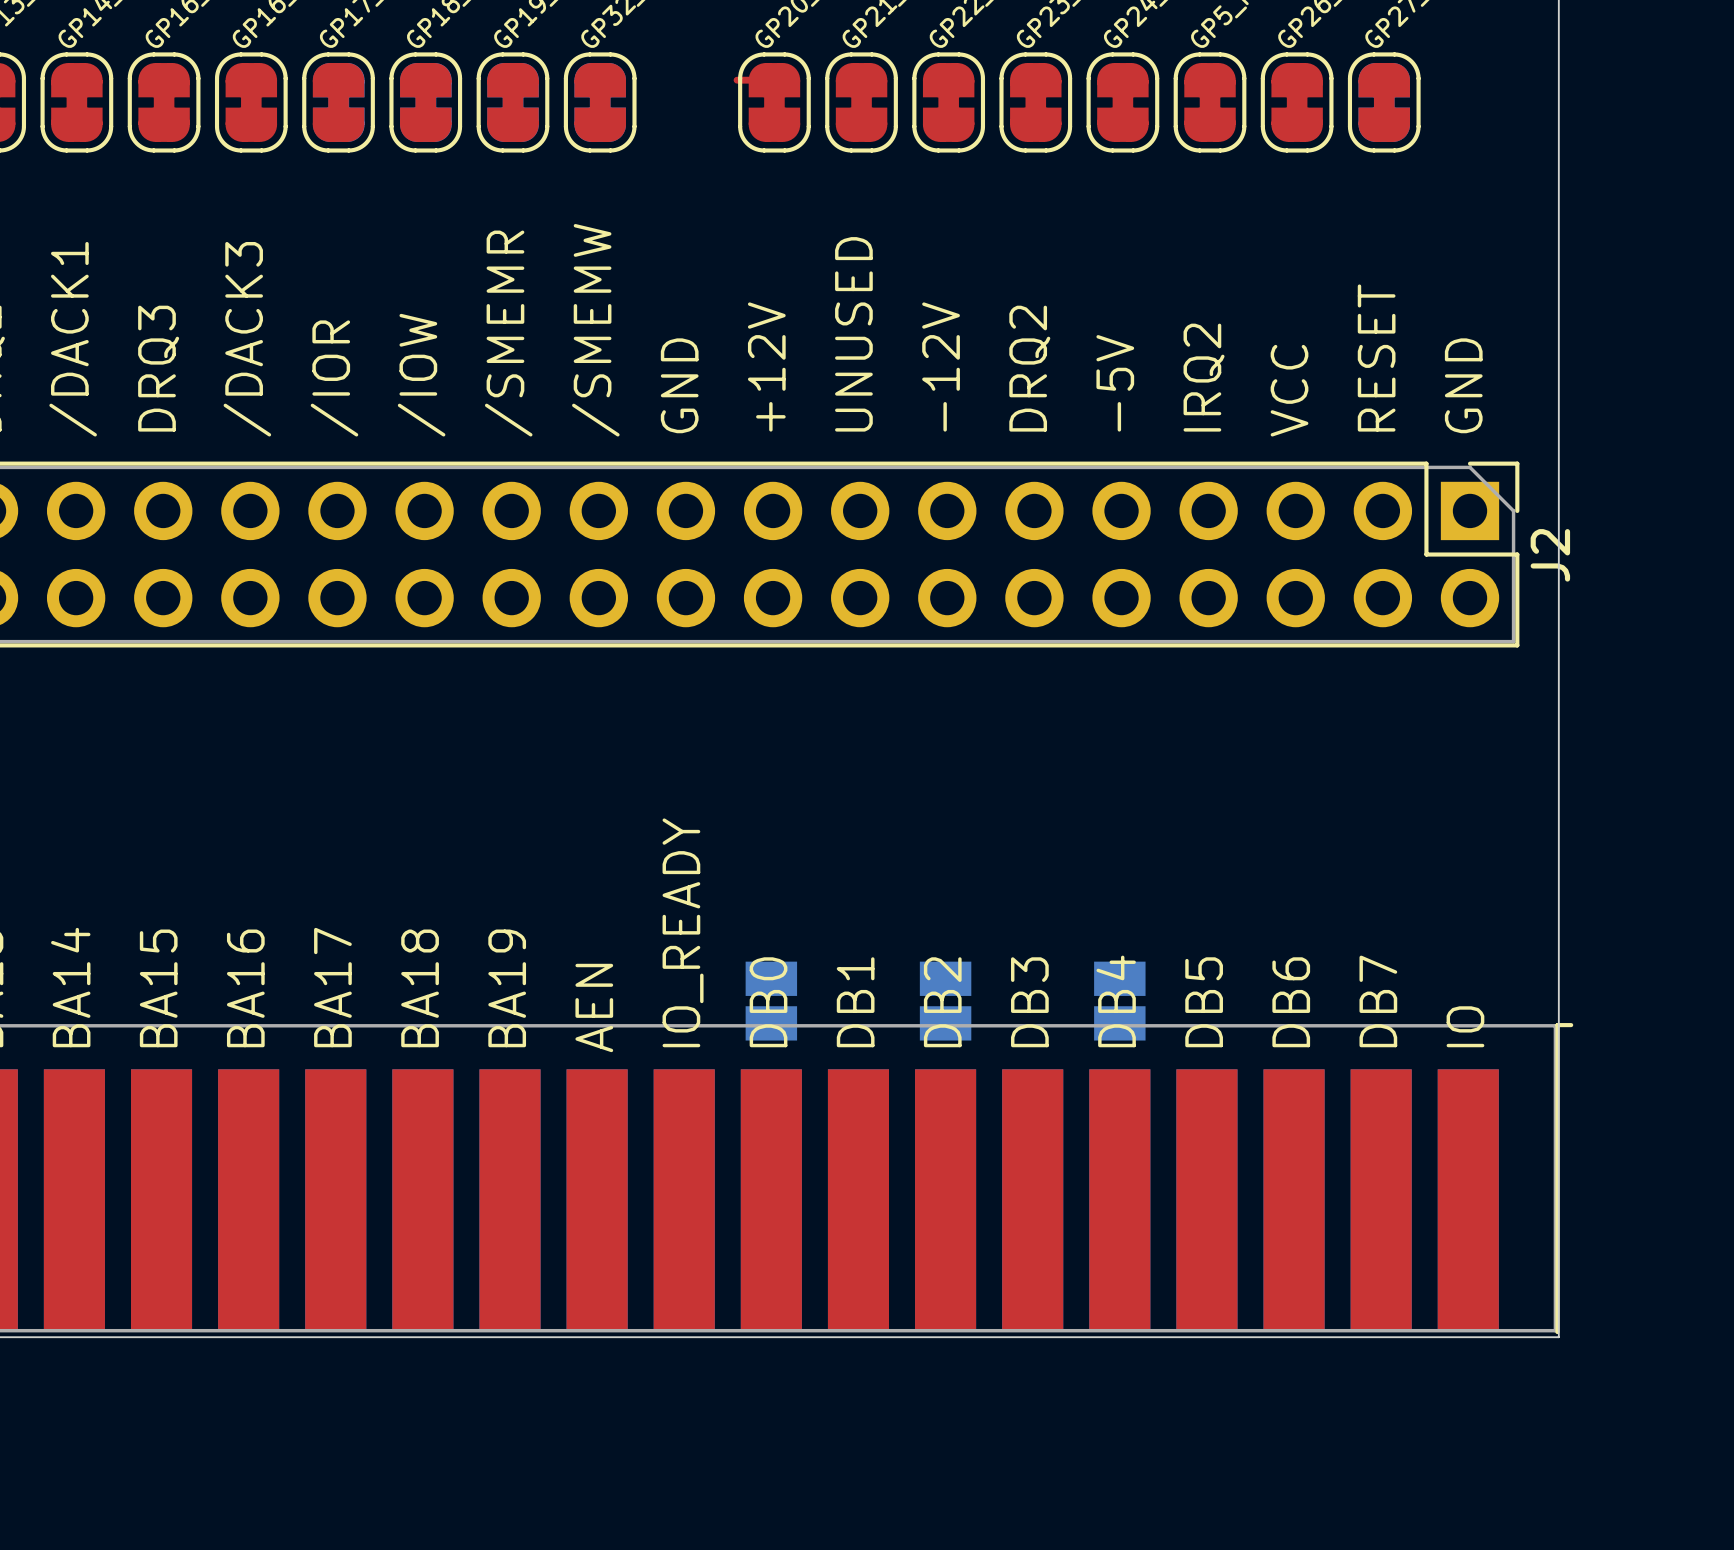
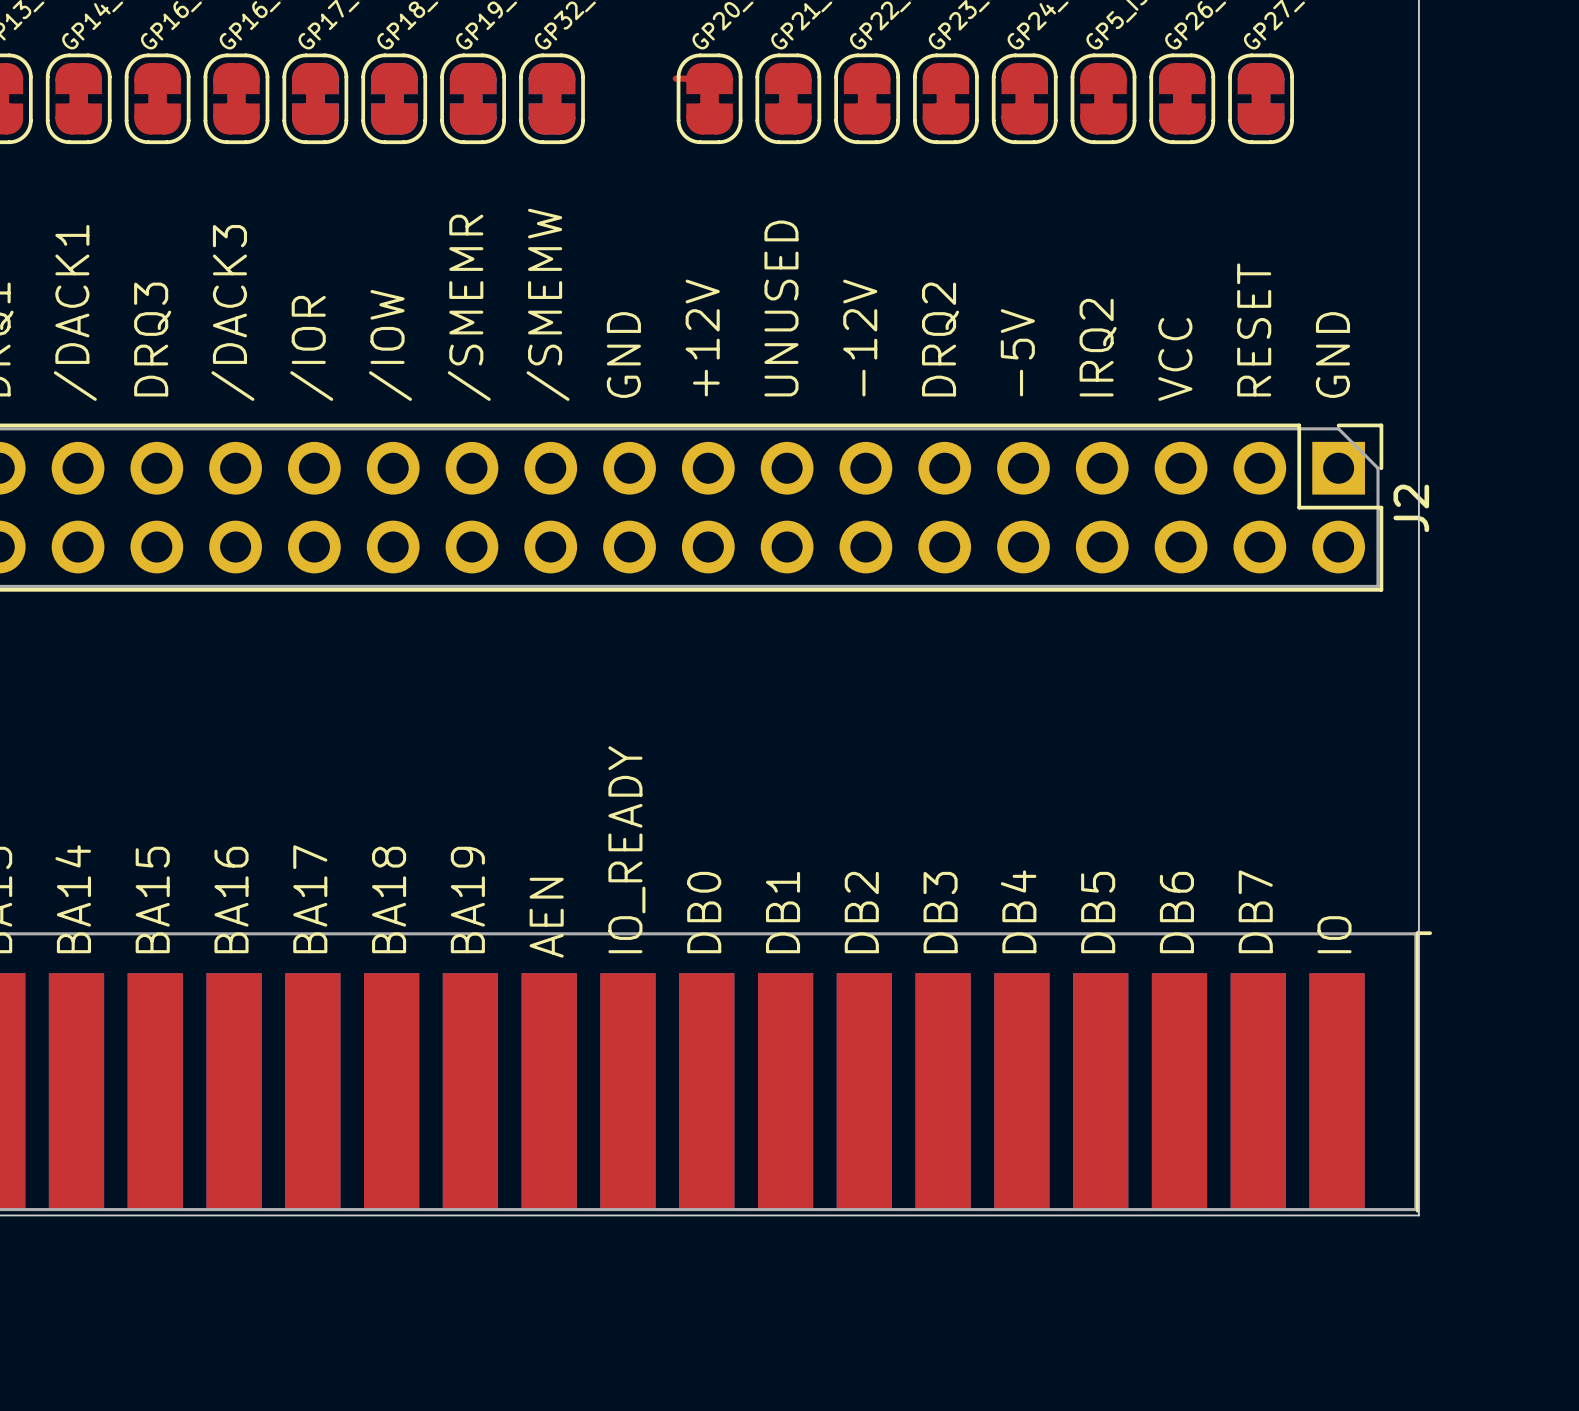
part: (771, 1001) -> none
part: (945, 1001) -> none
part: (1119, 1001) -> none

